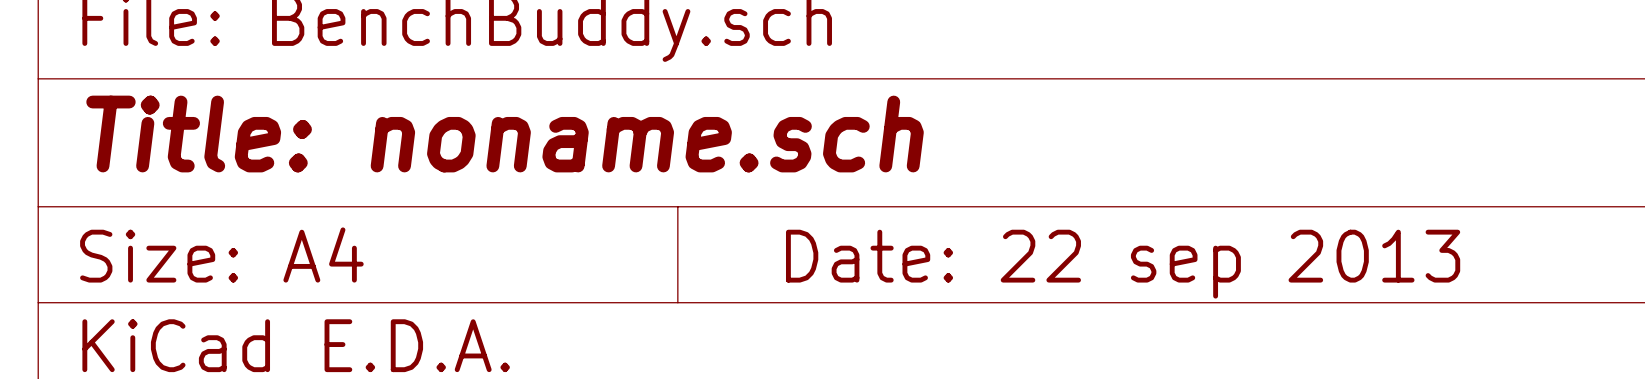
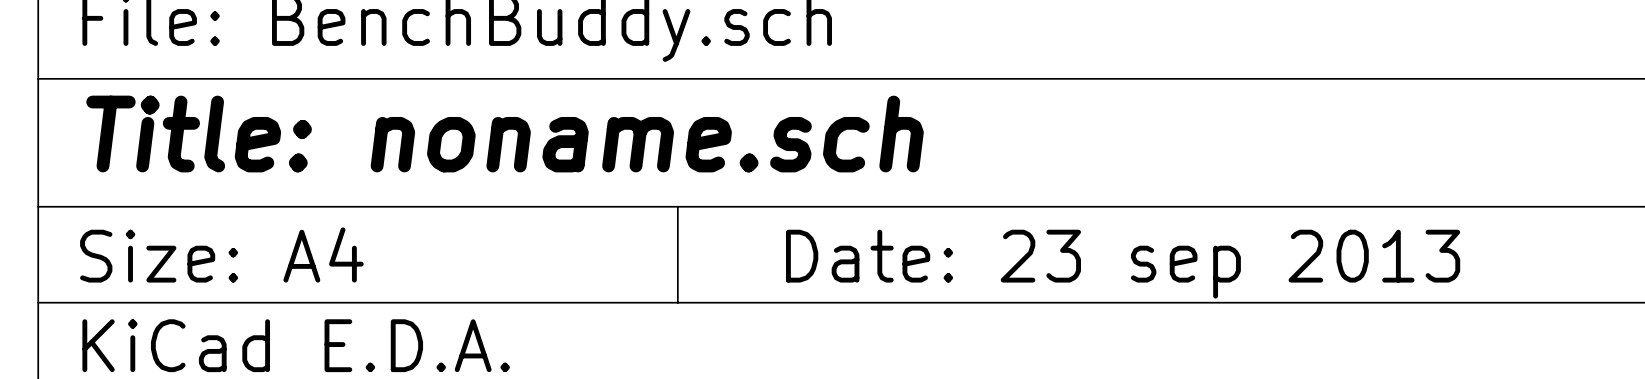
title block: Date: 22 sep 2013 (1123, 264) -> Date: 23 sep 2013 (1123, 264)

